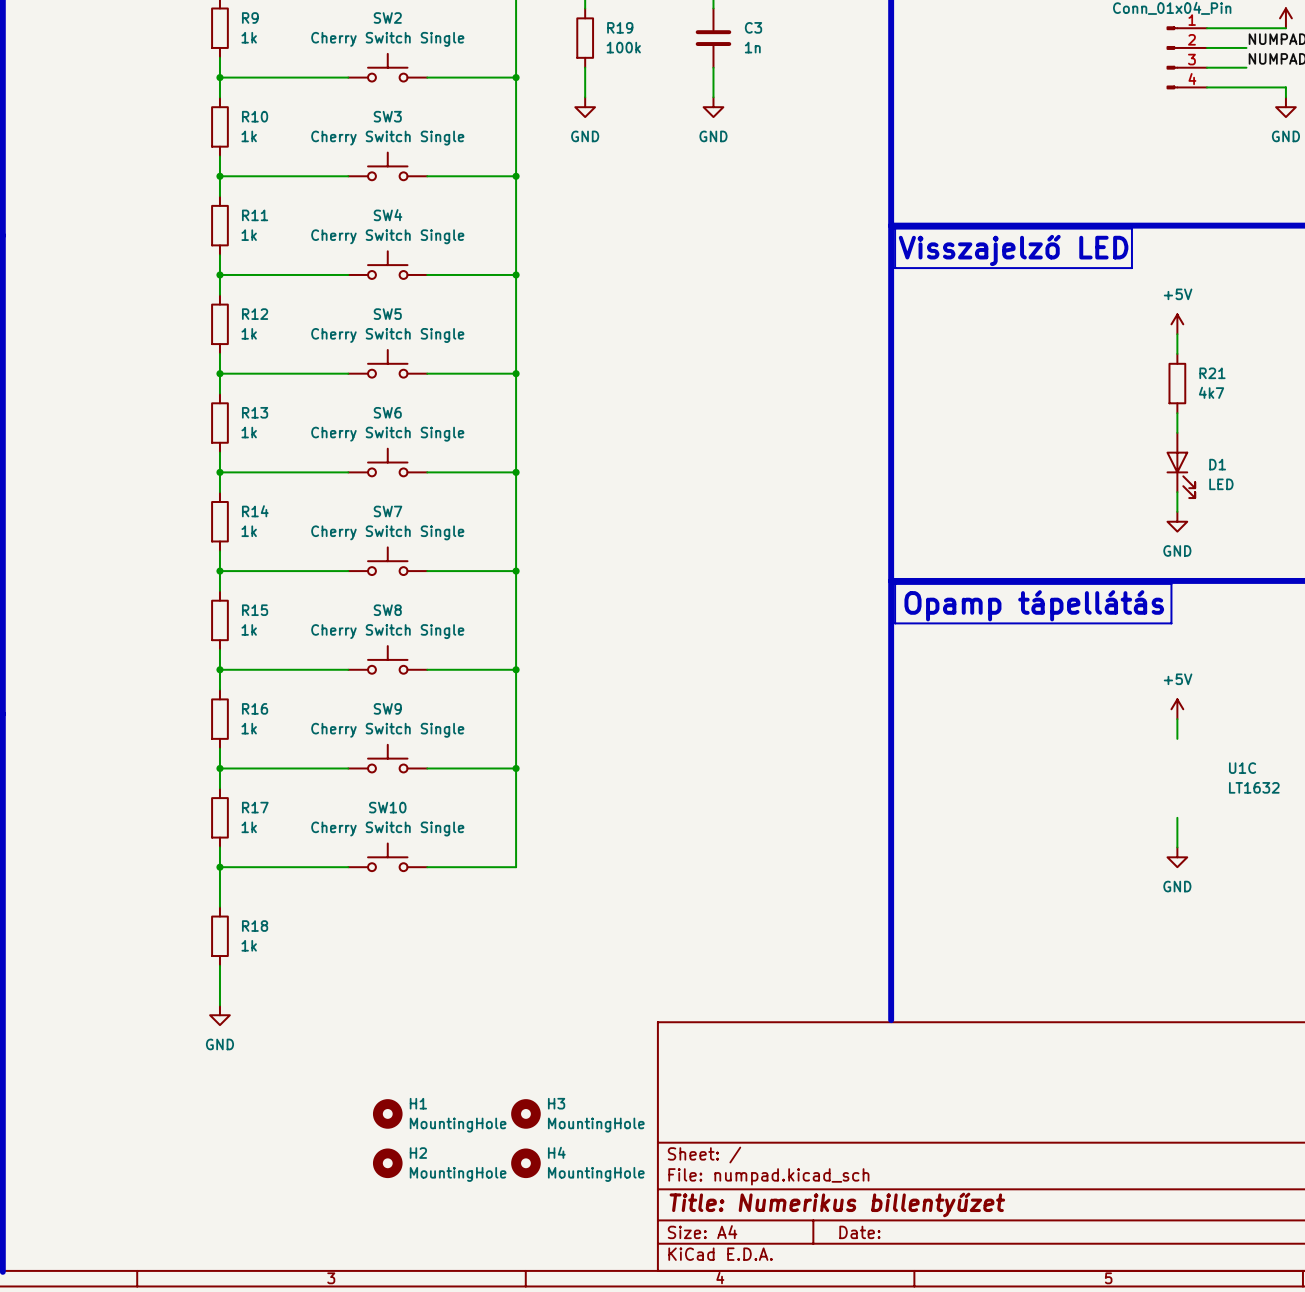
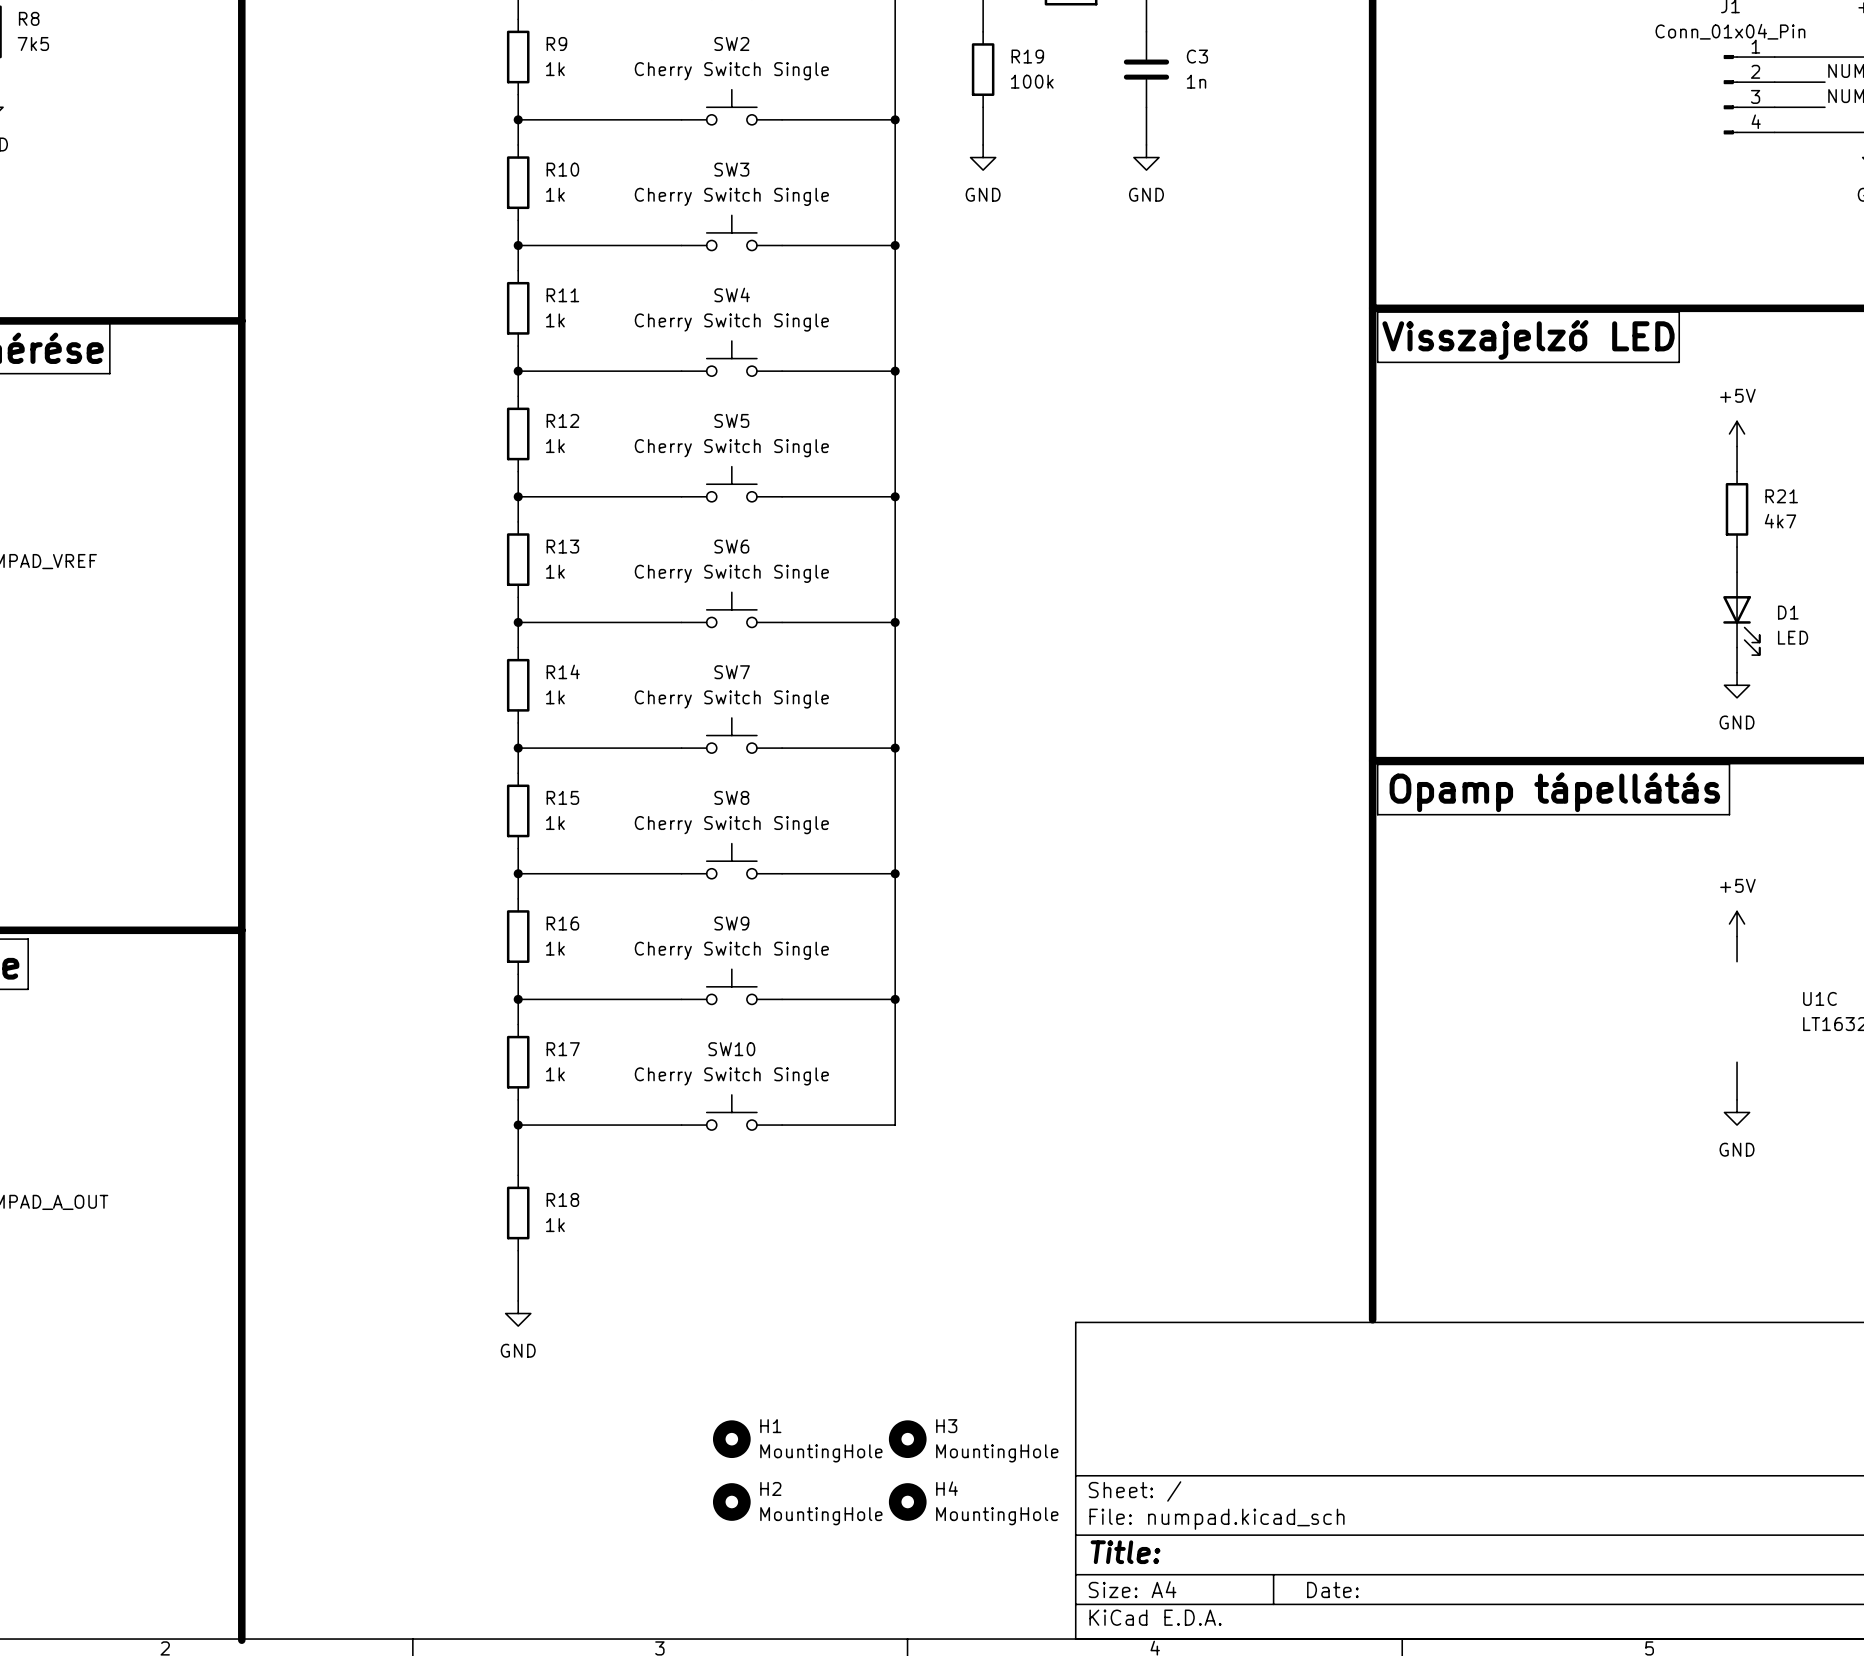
title block: Title: Numerikus billentyűzet (837, 1204) -> Title: (1125, 1552)

